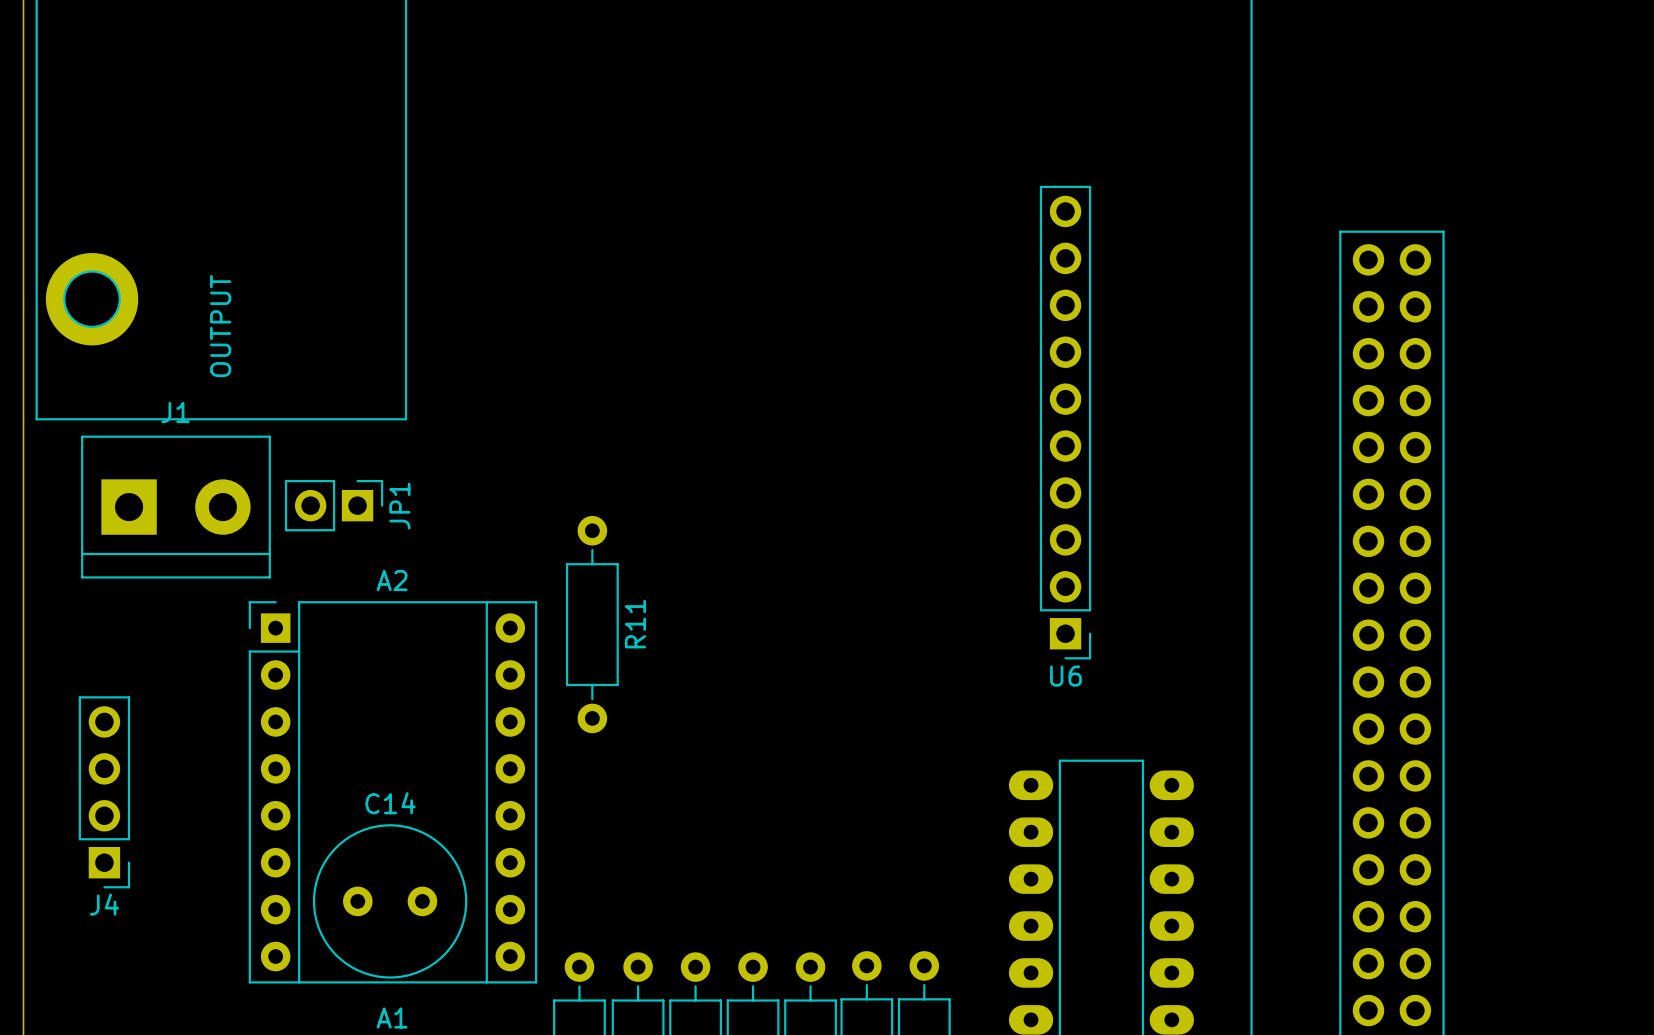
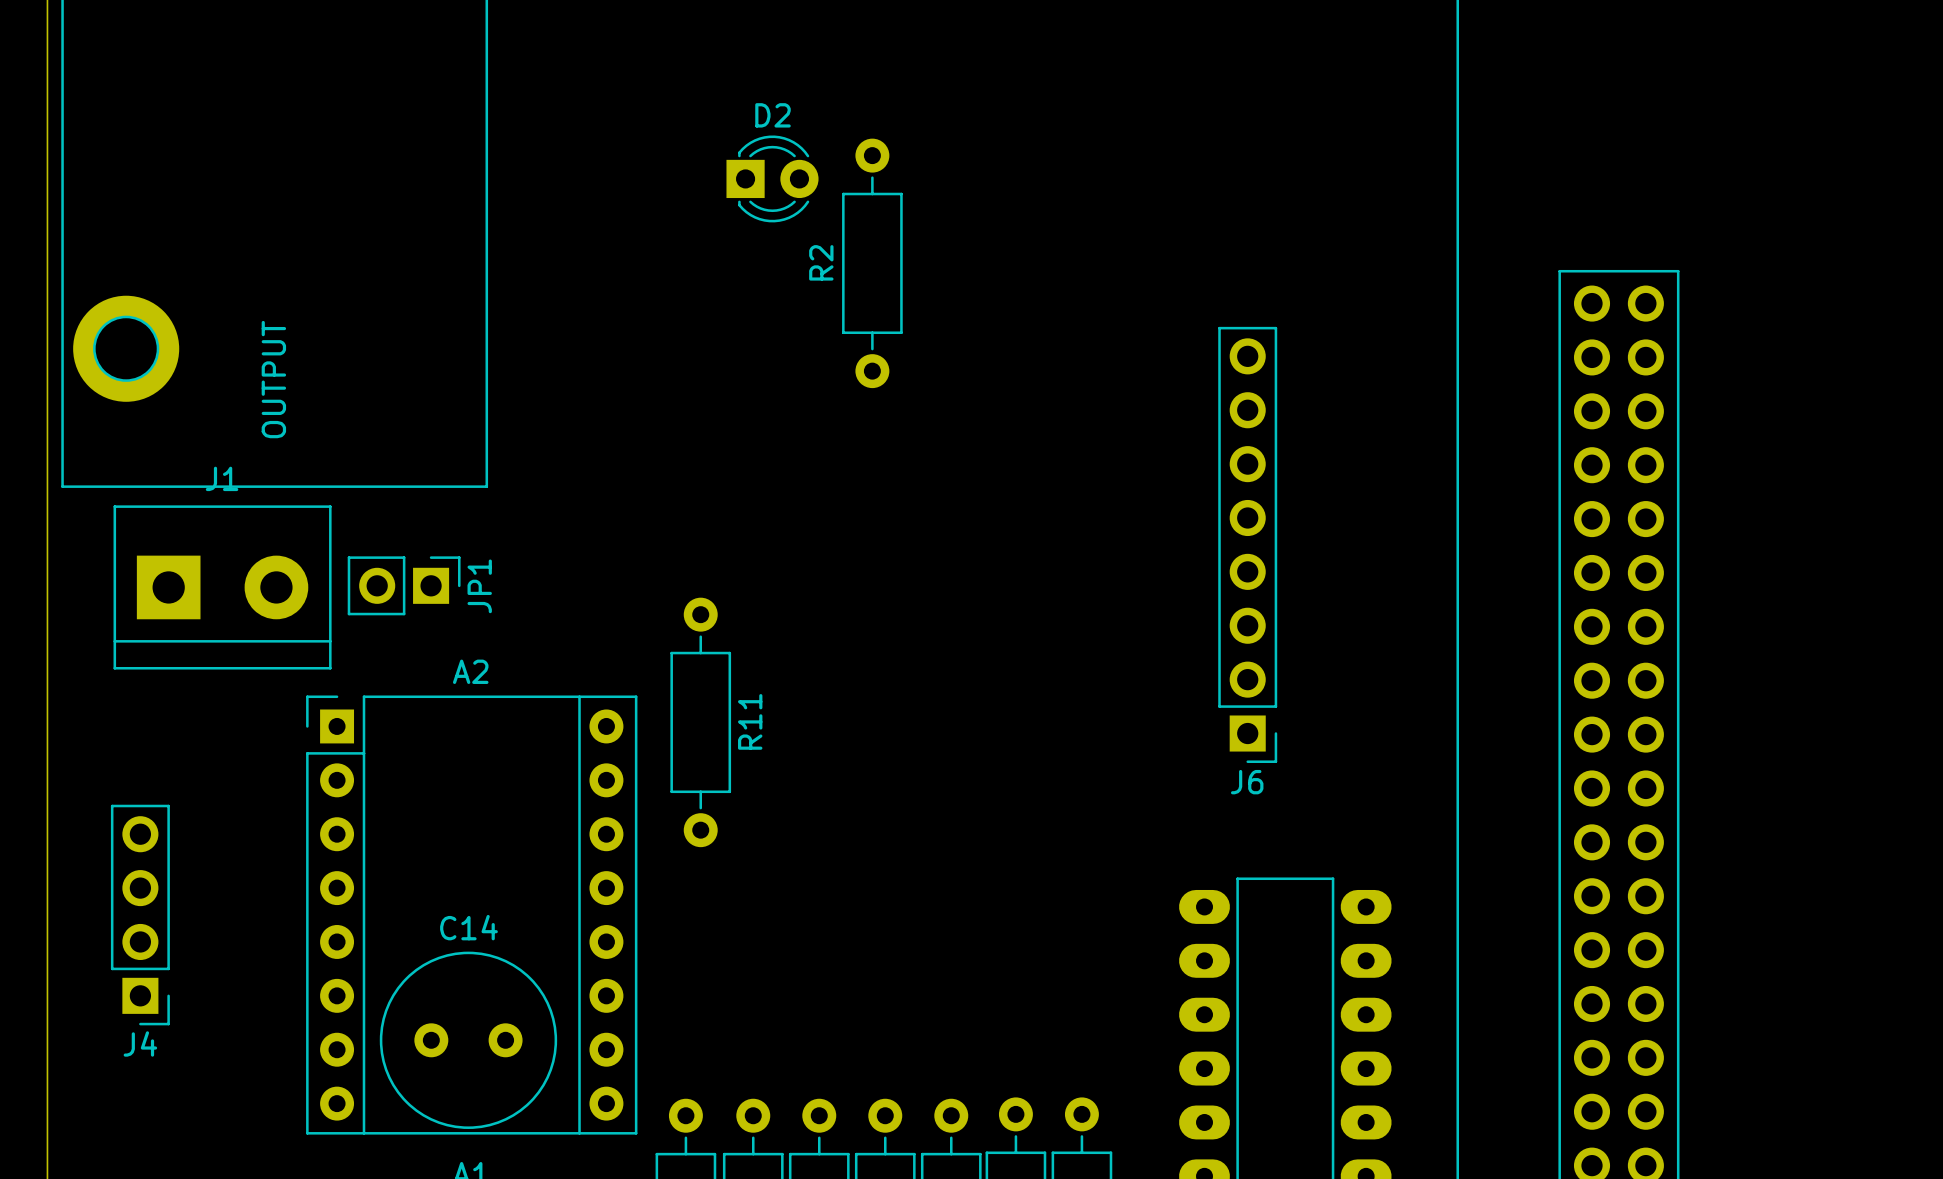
D2: none -> (772, 178)
R2: none -> (872, 263)
U6: (1065, 422) -> none
J6: none -> (1247, 544)

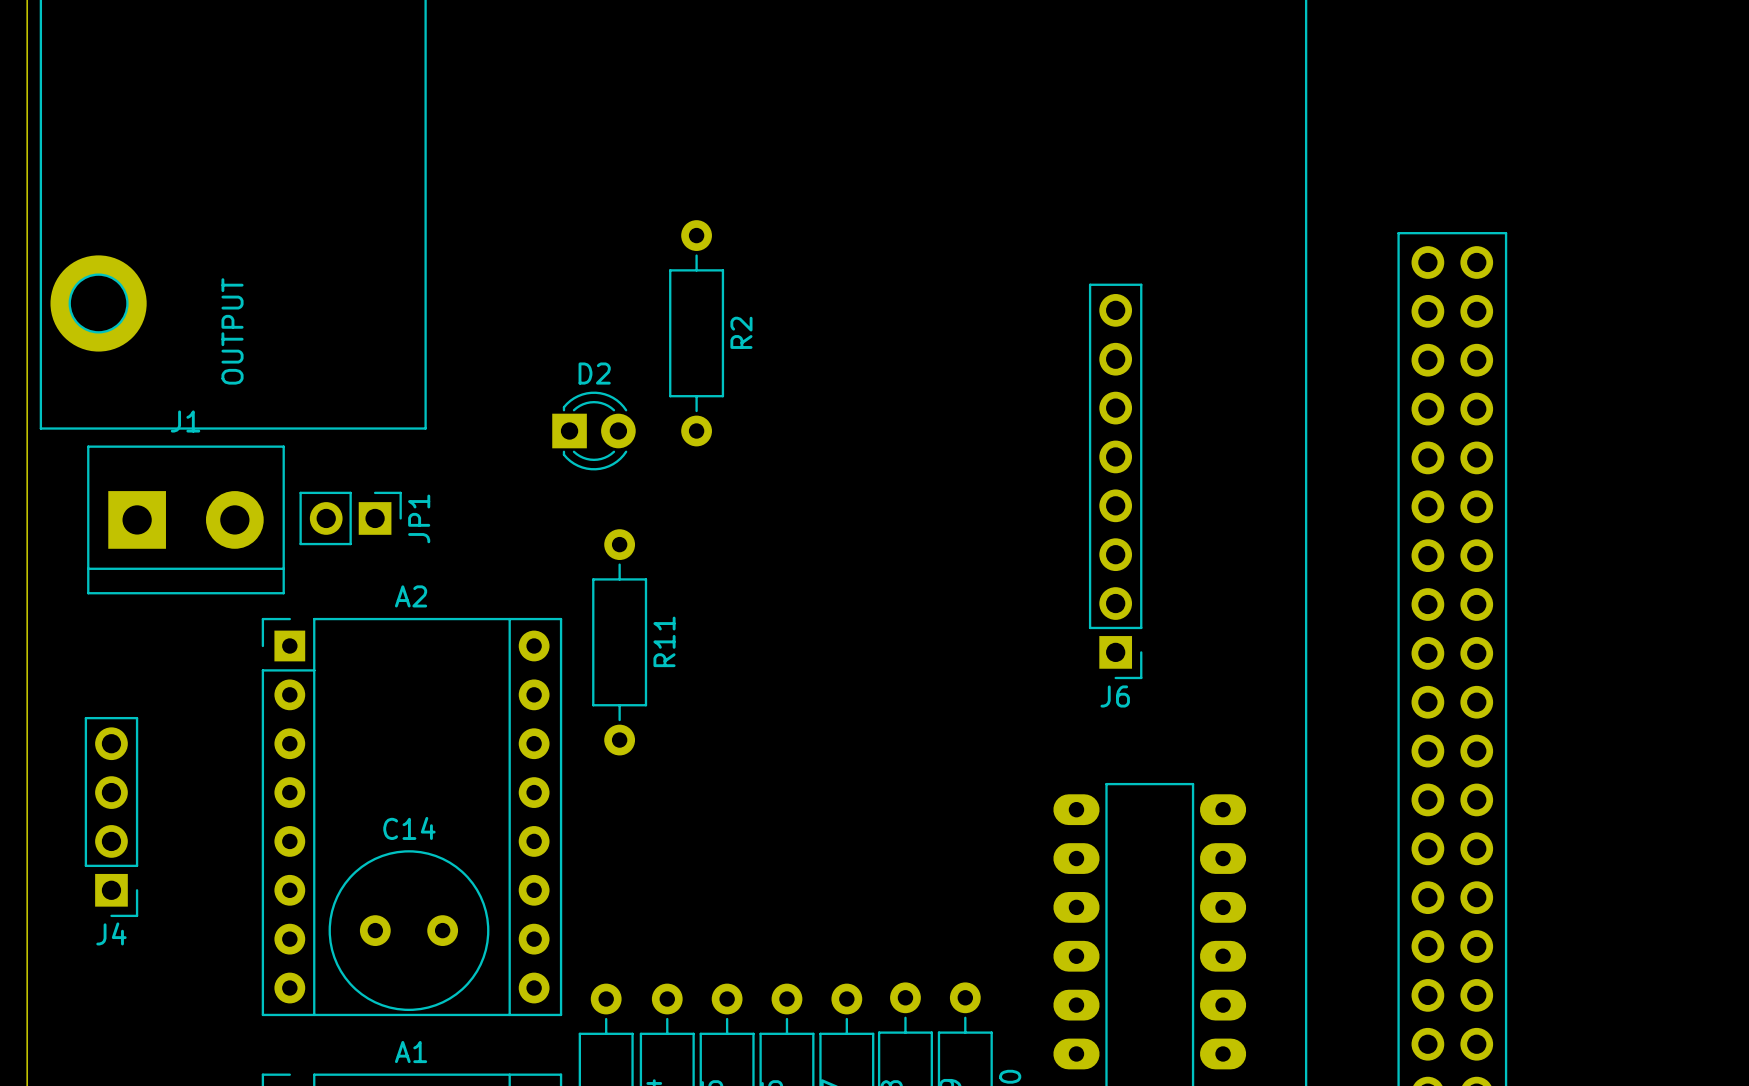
D2 position: (772, 178) -> (593, 431)
R2 name position: R2 (821, 262) -> R2 (741, 332)
R2 position: (872, 263) -> (696, 333)

